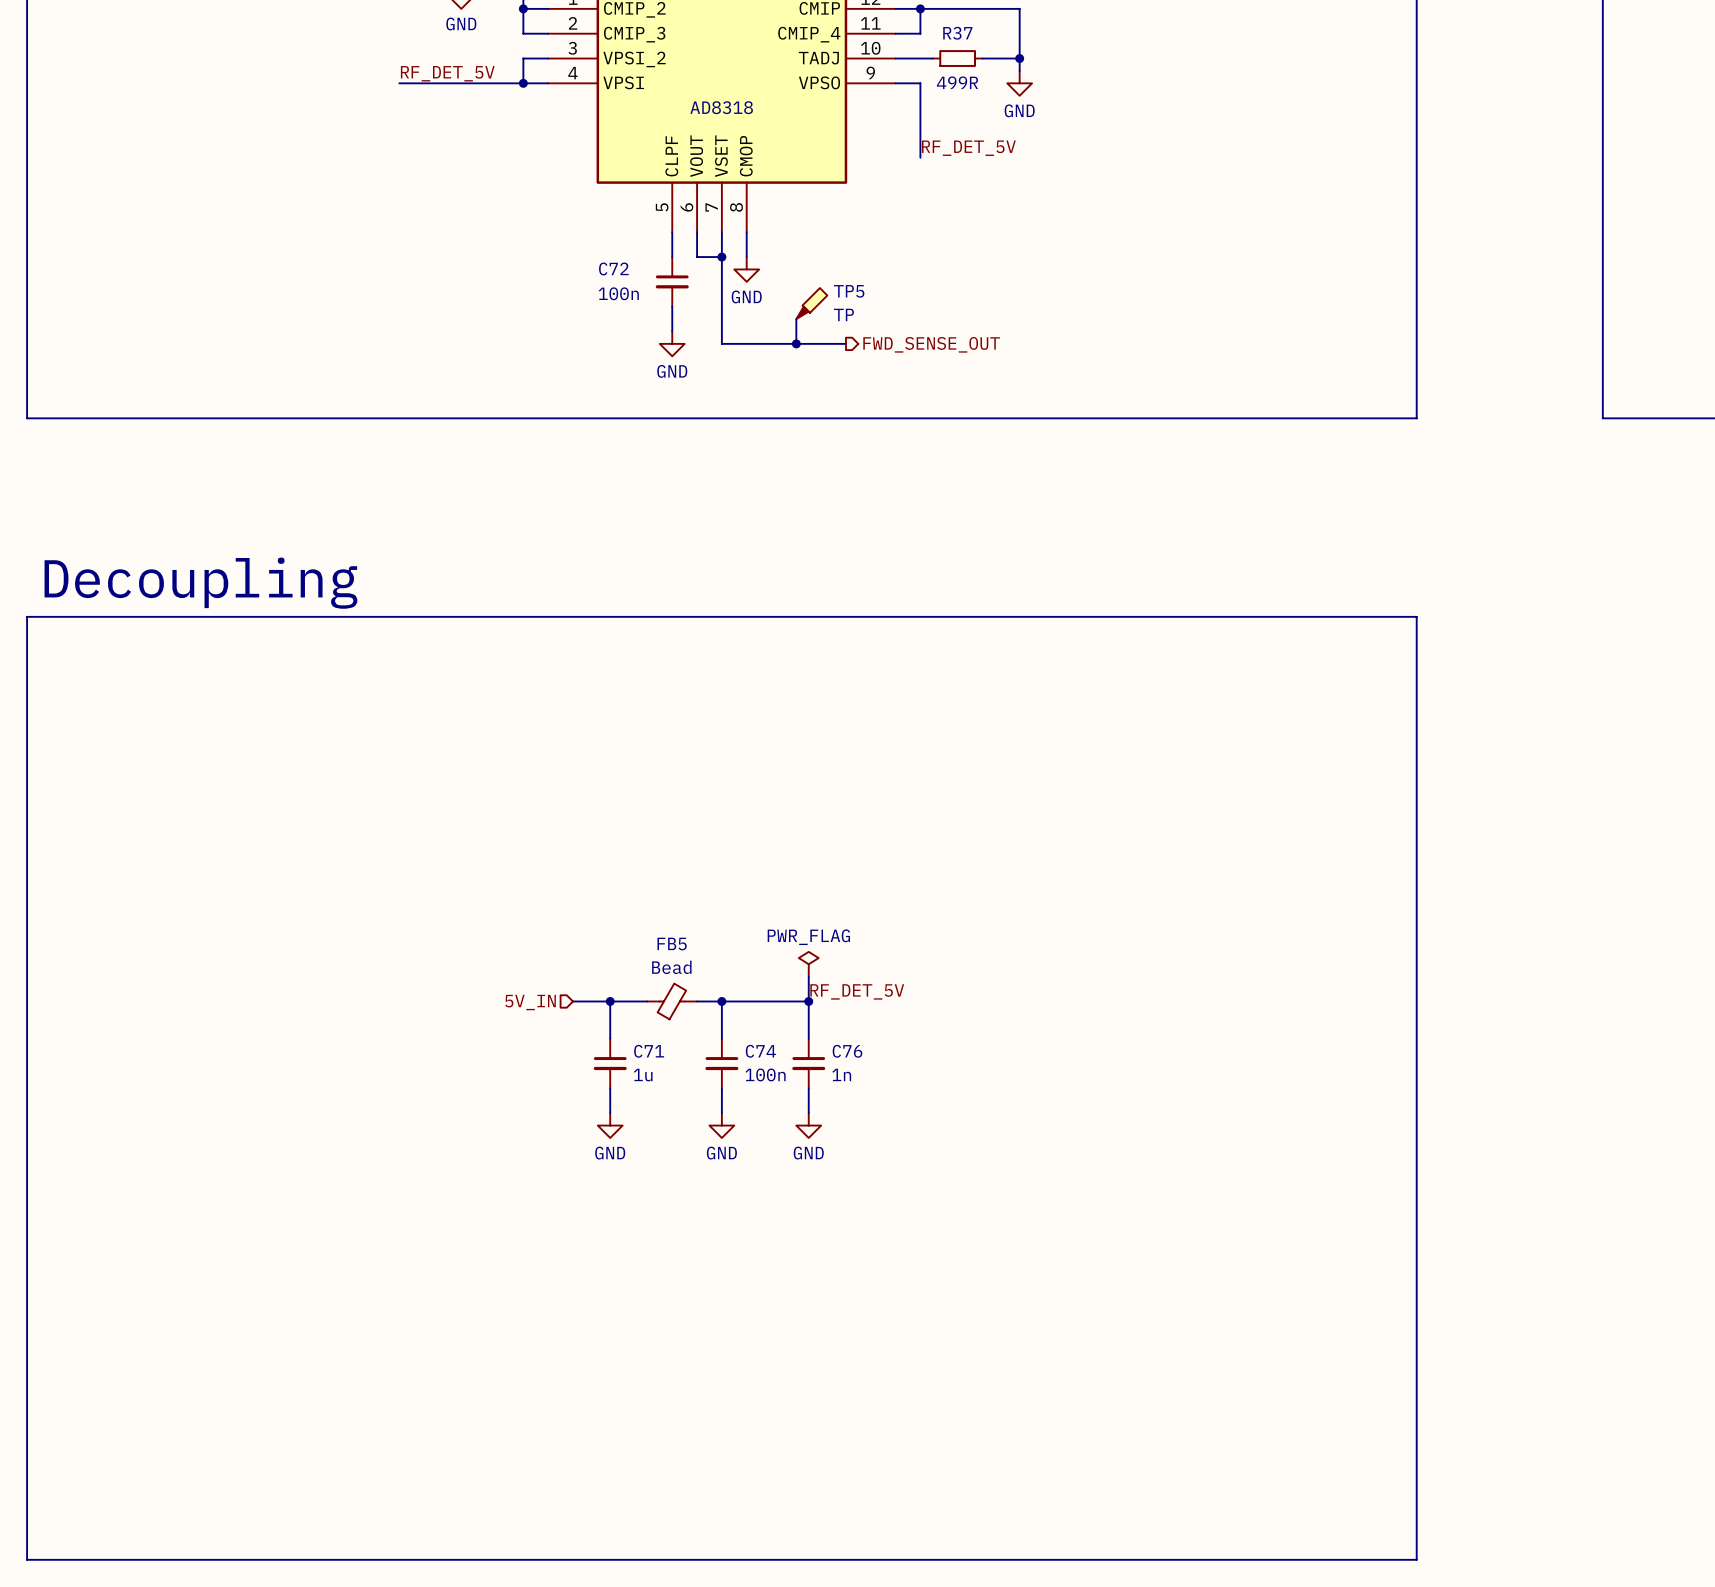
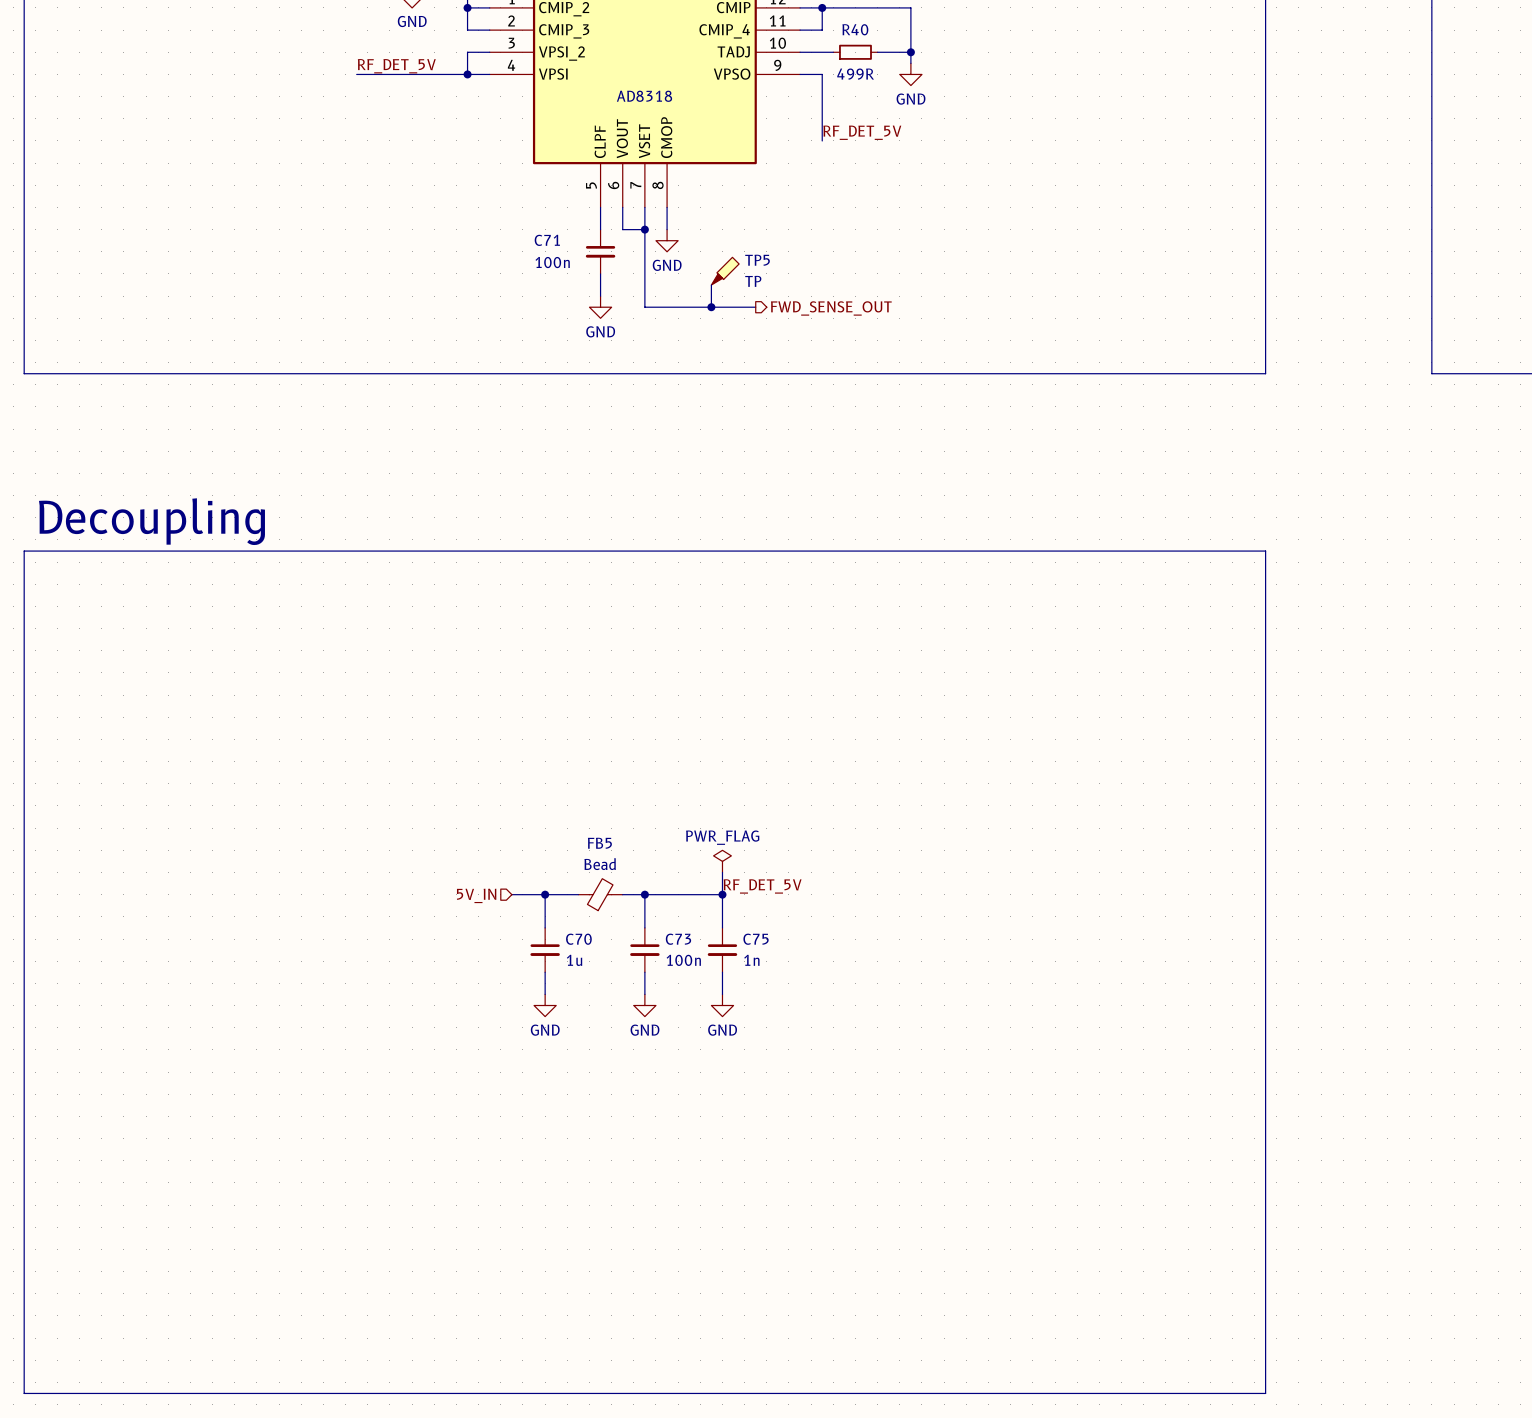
R37 name: R37 (957, 33) -> R40 (855, 29)
C72 name: C72 (613, 268) -> C71 (547, 240)
C71 name: C71 (649, 1051) -> C70 (578, 939)
C74 name: C74 (760, 1051) -> C73 (678, 939)
C76 name: C76 (847, 1051) -> C75 (756, 939)

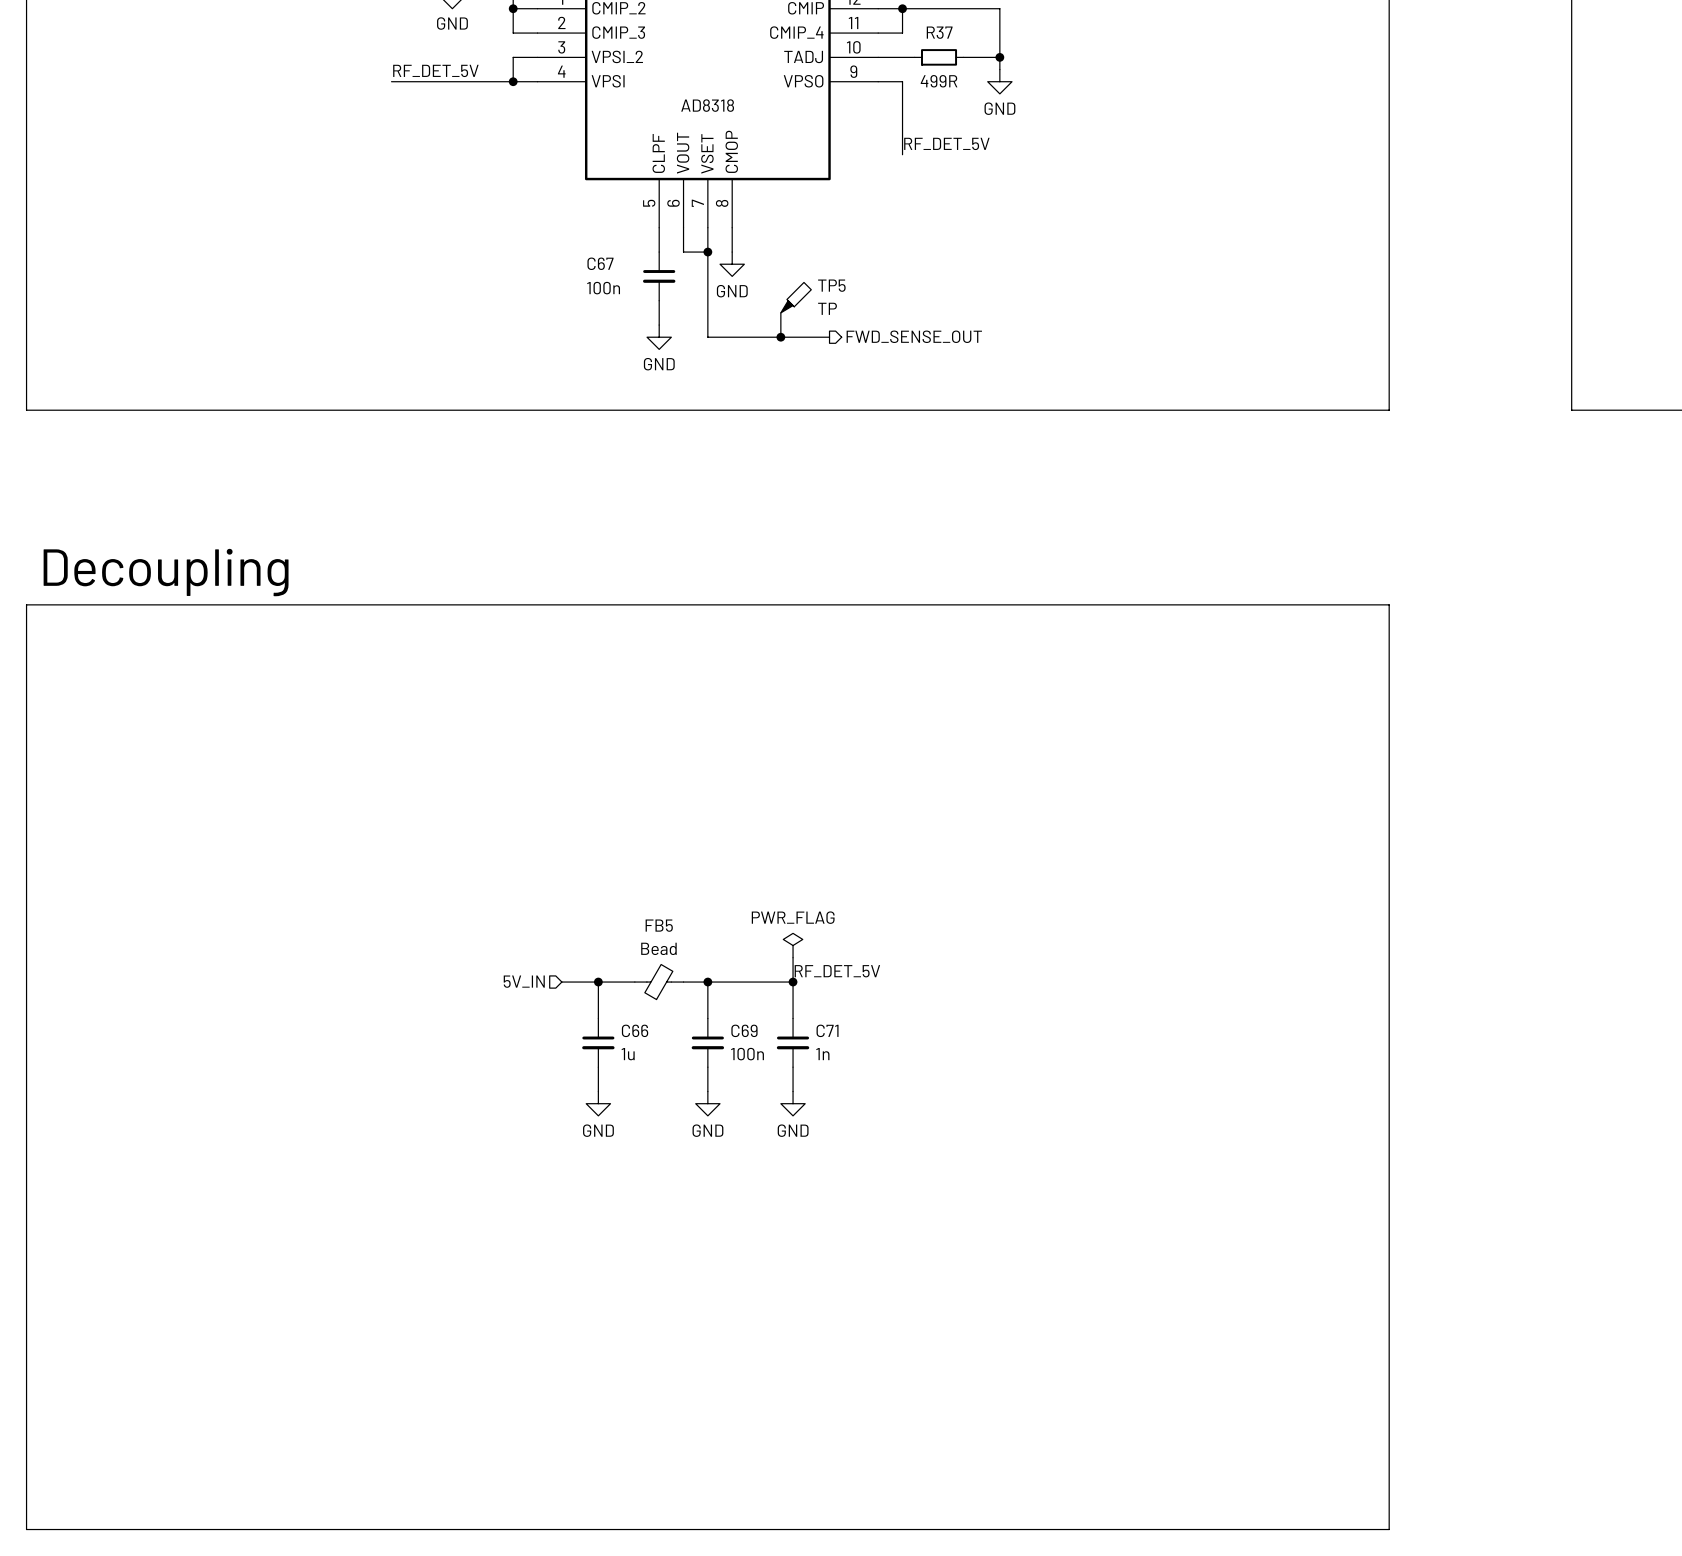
R40 name: R40 (855, 29) -> R37 (939, 32)
C71 name: C71 (547, 240) -> C67 (600, 263)
C70 name: C70 (578, 939) -> C66 (635, 1030)
C73 name: C73 (678, 939) -> C69 (744, 1030)
C75 name: C75 (756, 939) -> C71 (827, 1030)

